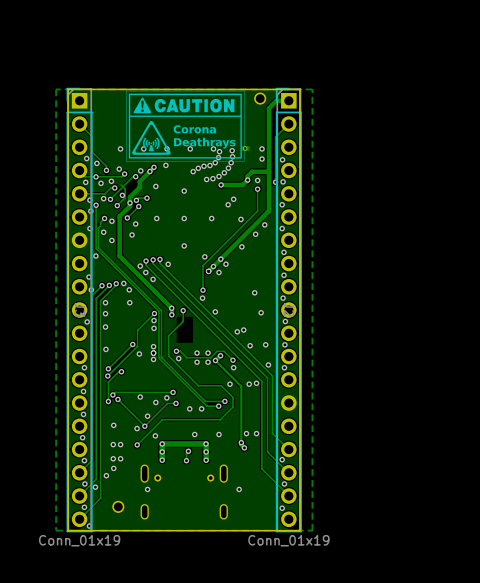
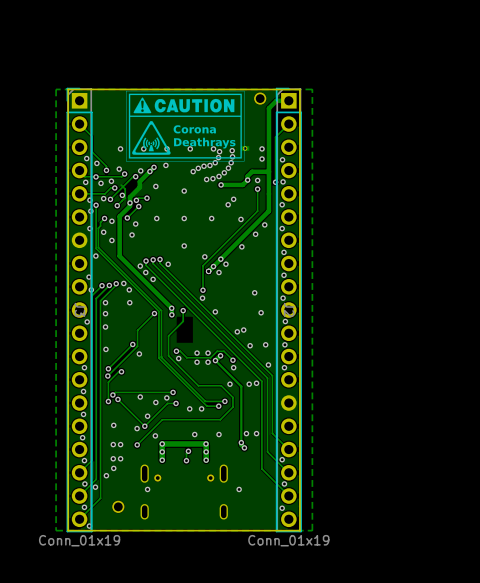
via: (154, 320) -> none
via: (154, 328) -> none
via: (153, 346) -> none
via: (153, 353) -> none
via: (153, 359) -> none

